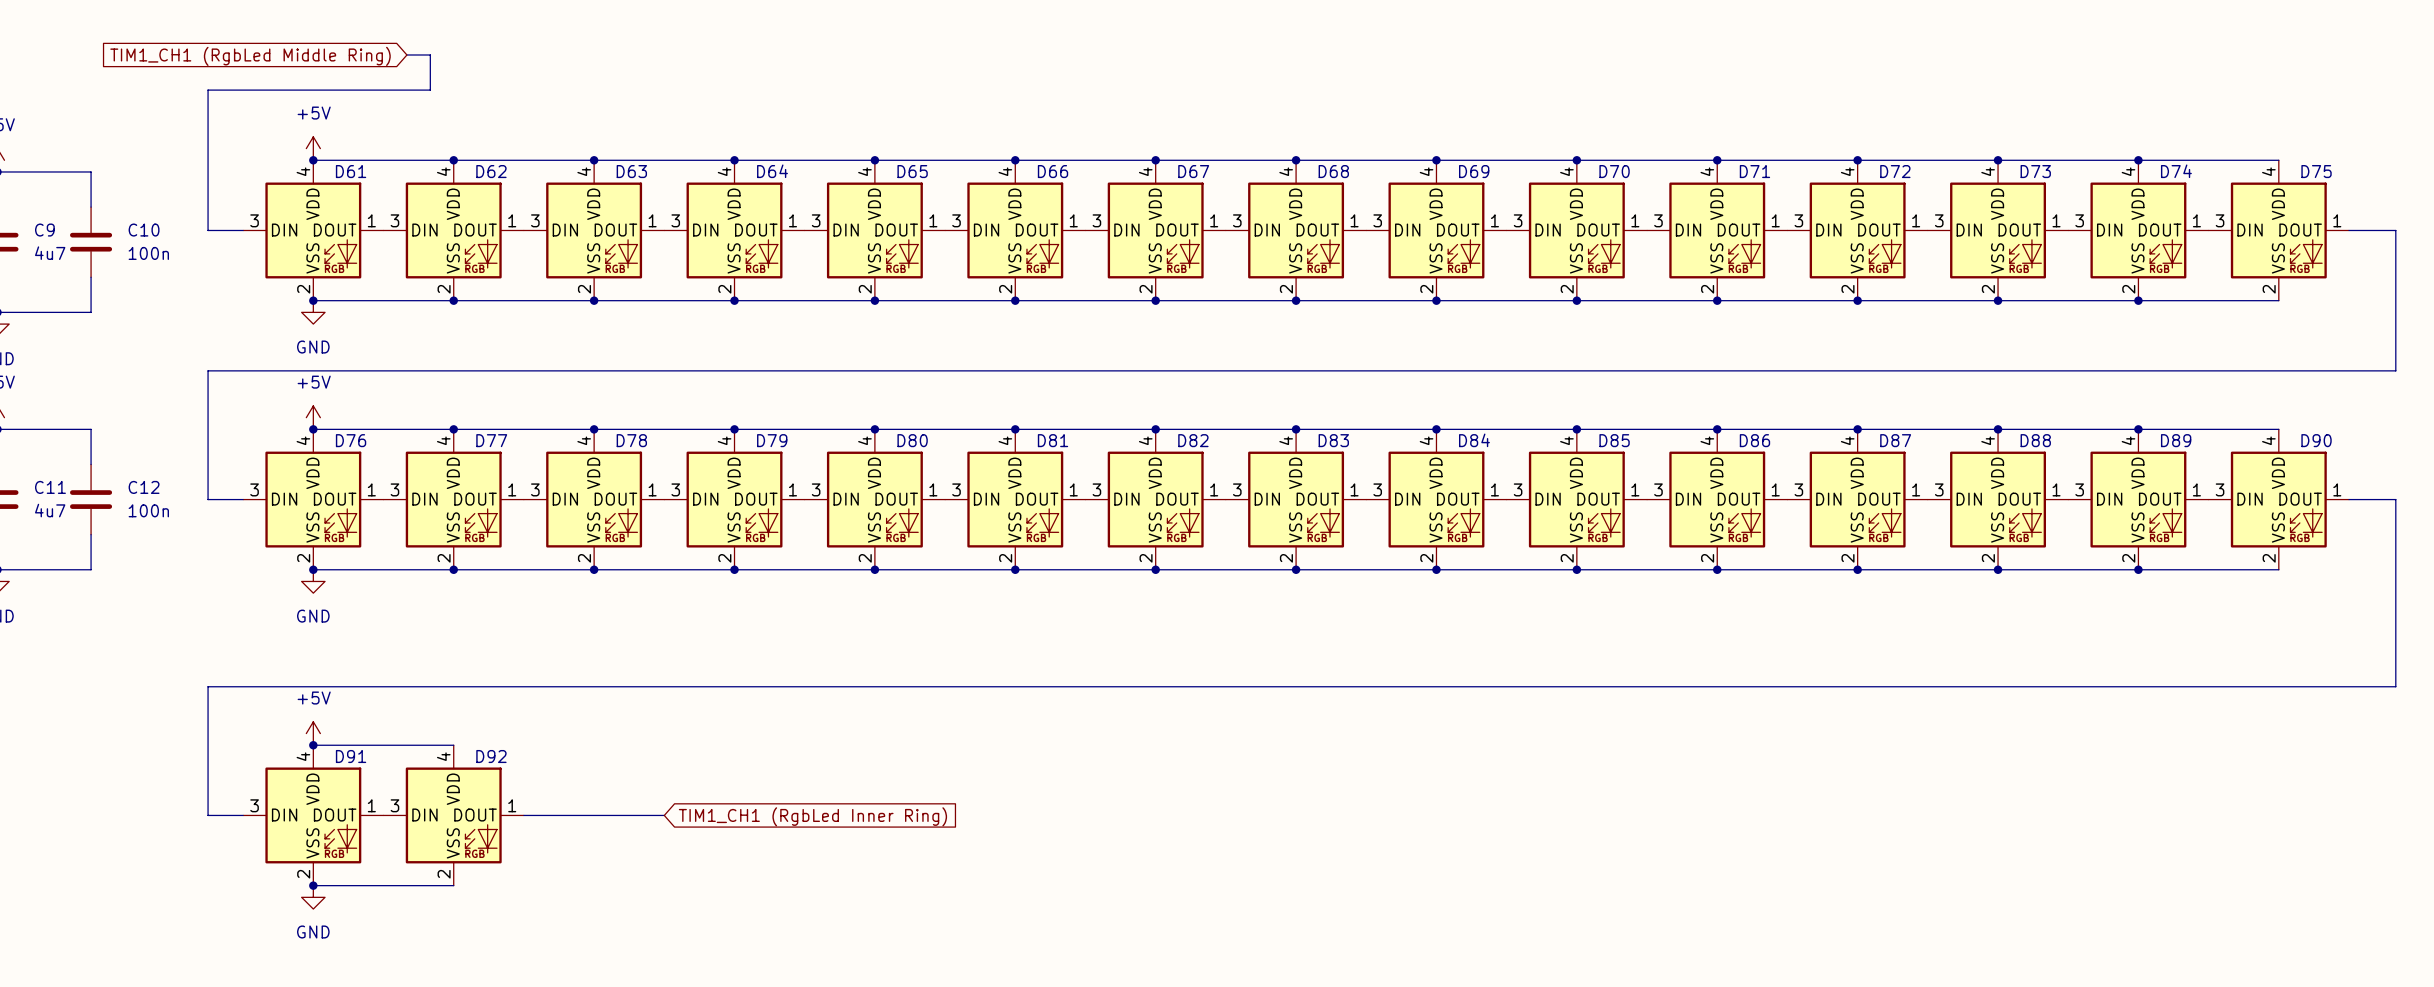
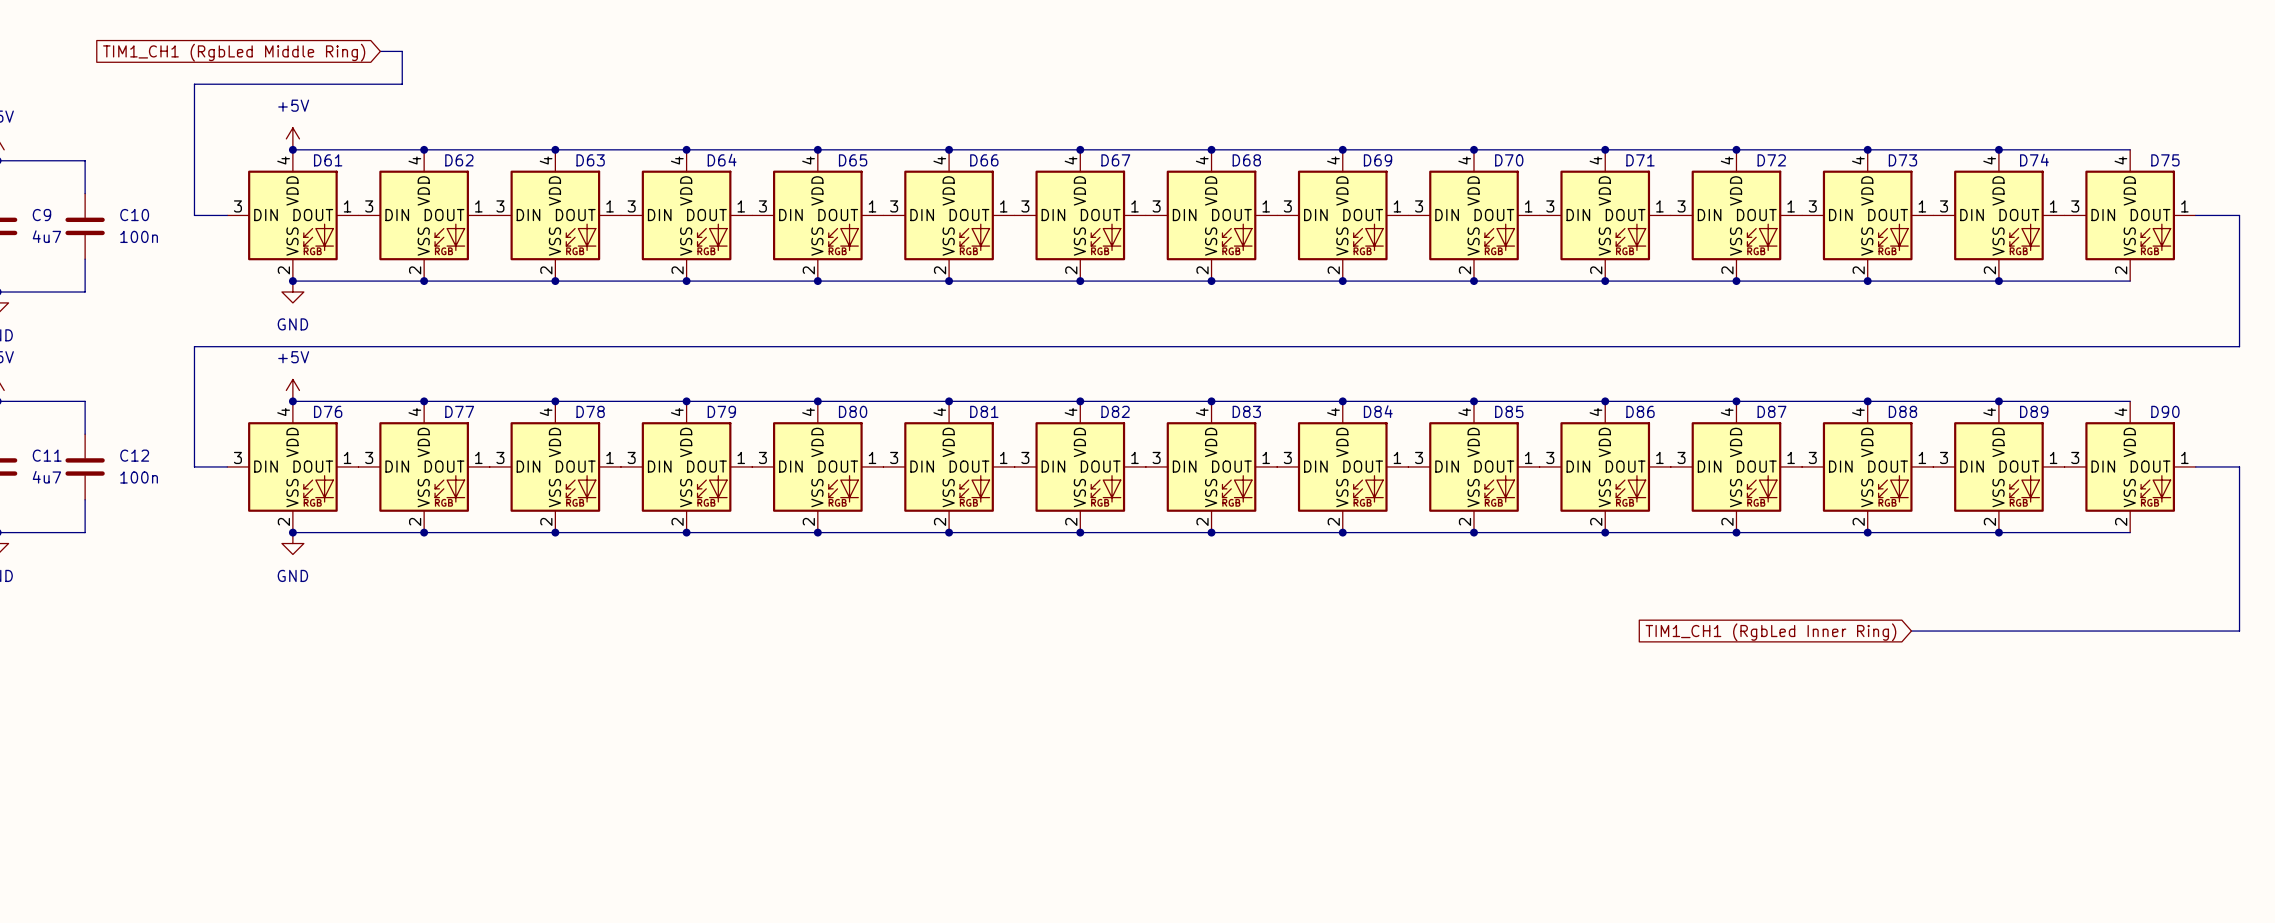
wire: (2395, 675) (2395, 686) (208, 686) (208, 815) (243, 815) -> (2239, 631) (1911, 631)
global label: none -> TIM1_CH1 (RgbLed Inner Ring) (1770, 632)
power symbol: +5V (313, 733) -> none
wire: (313, 745) (453, 745) -> none
junction: (313, 745) -> none
D91: (313, 815) -> none
D92: (453, 815) -> none
wire: (523, 815) (664, 815) -> none
global label: TIM1_CH1 (RgbLed Inner Ring) (812, 816) -> none
wire: (313, 885) (453, 885) -> none
junction: (313, 885) -> none
power symbol: GND (313, 897) -> none

